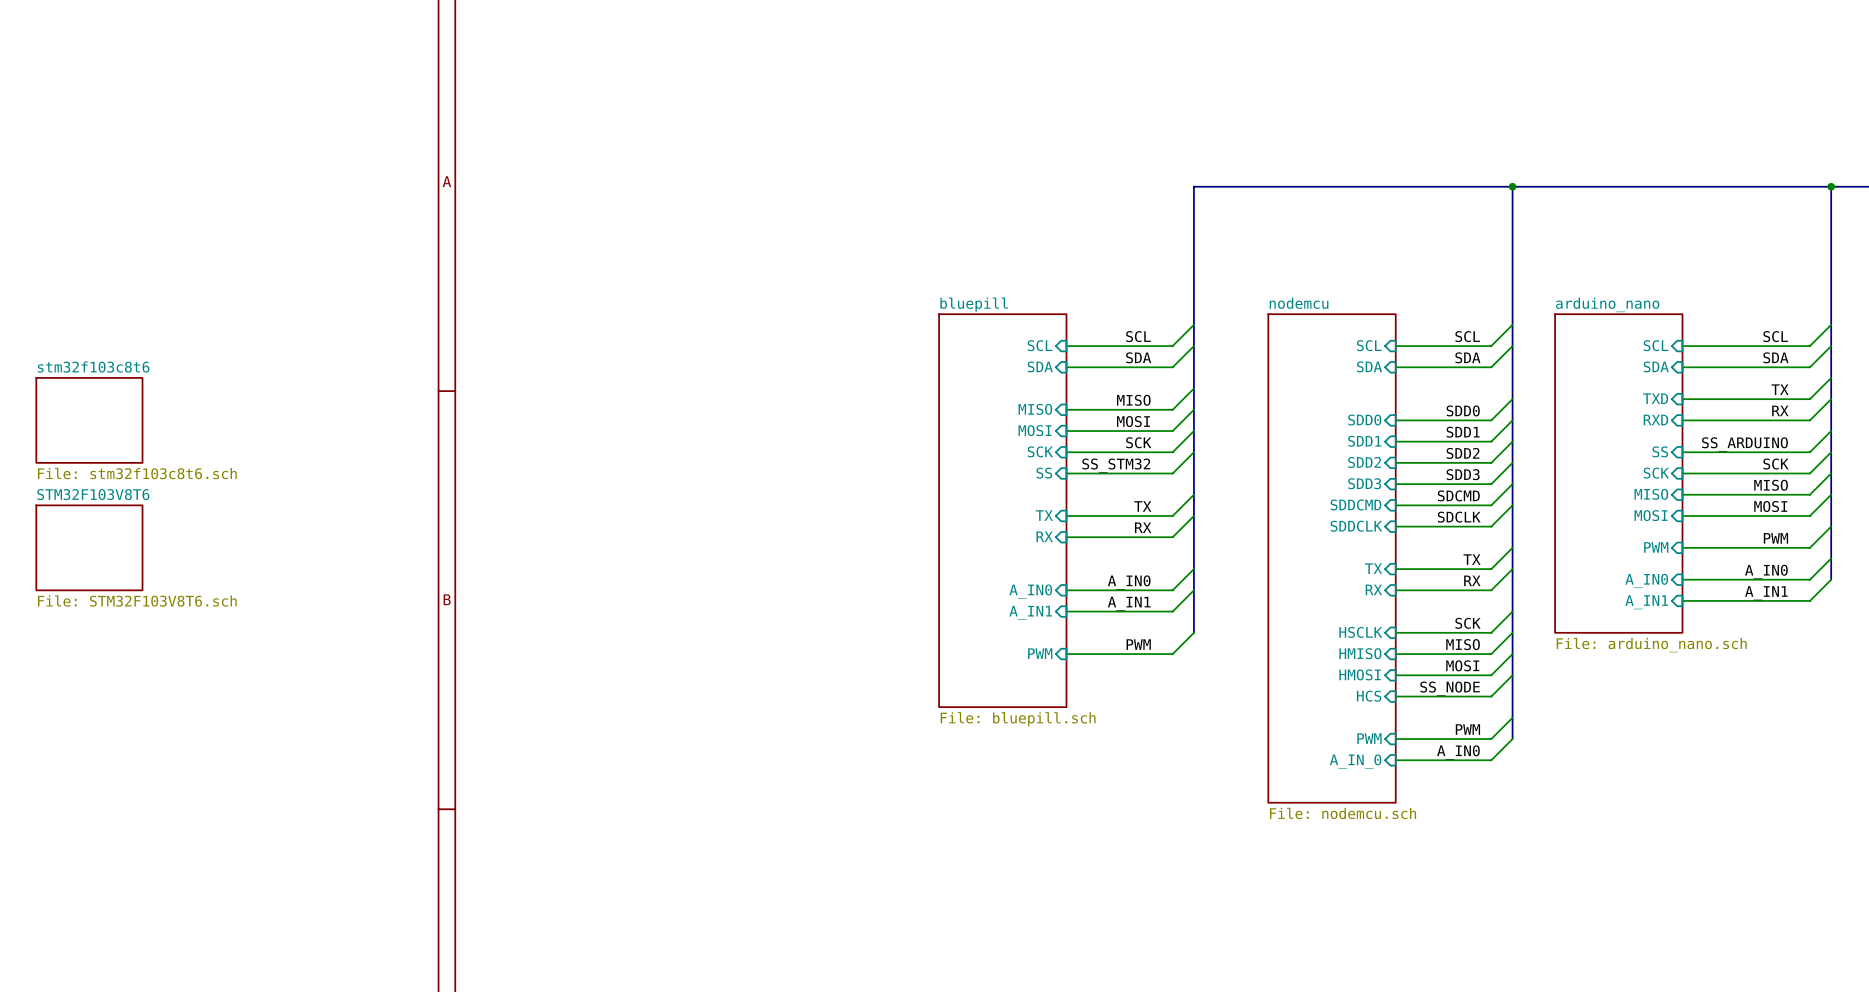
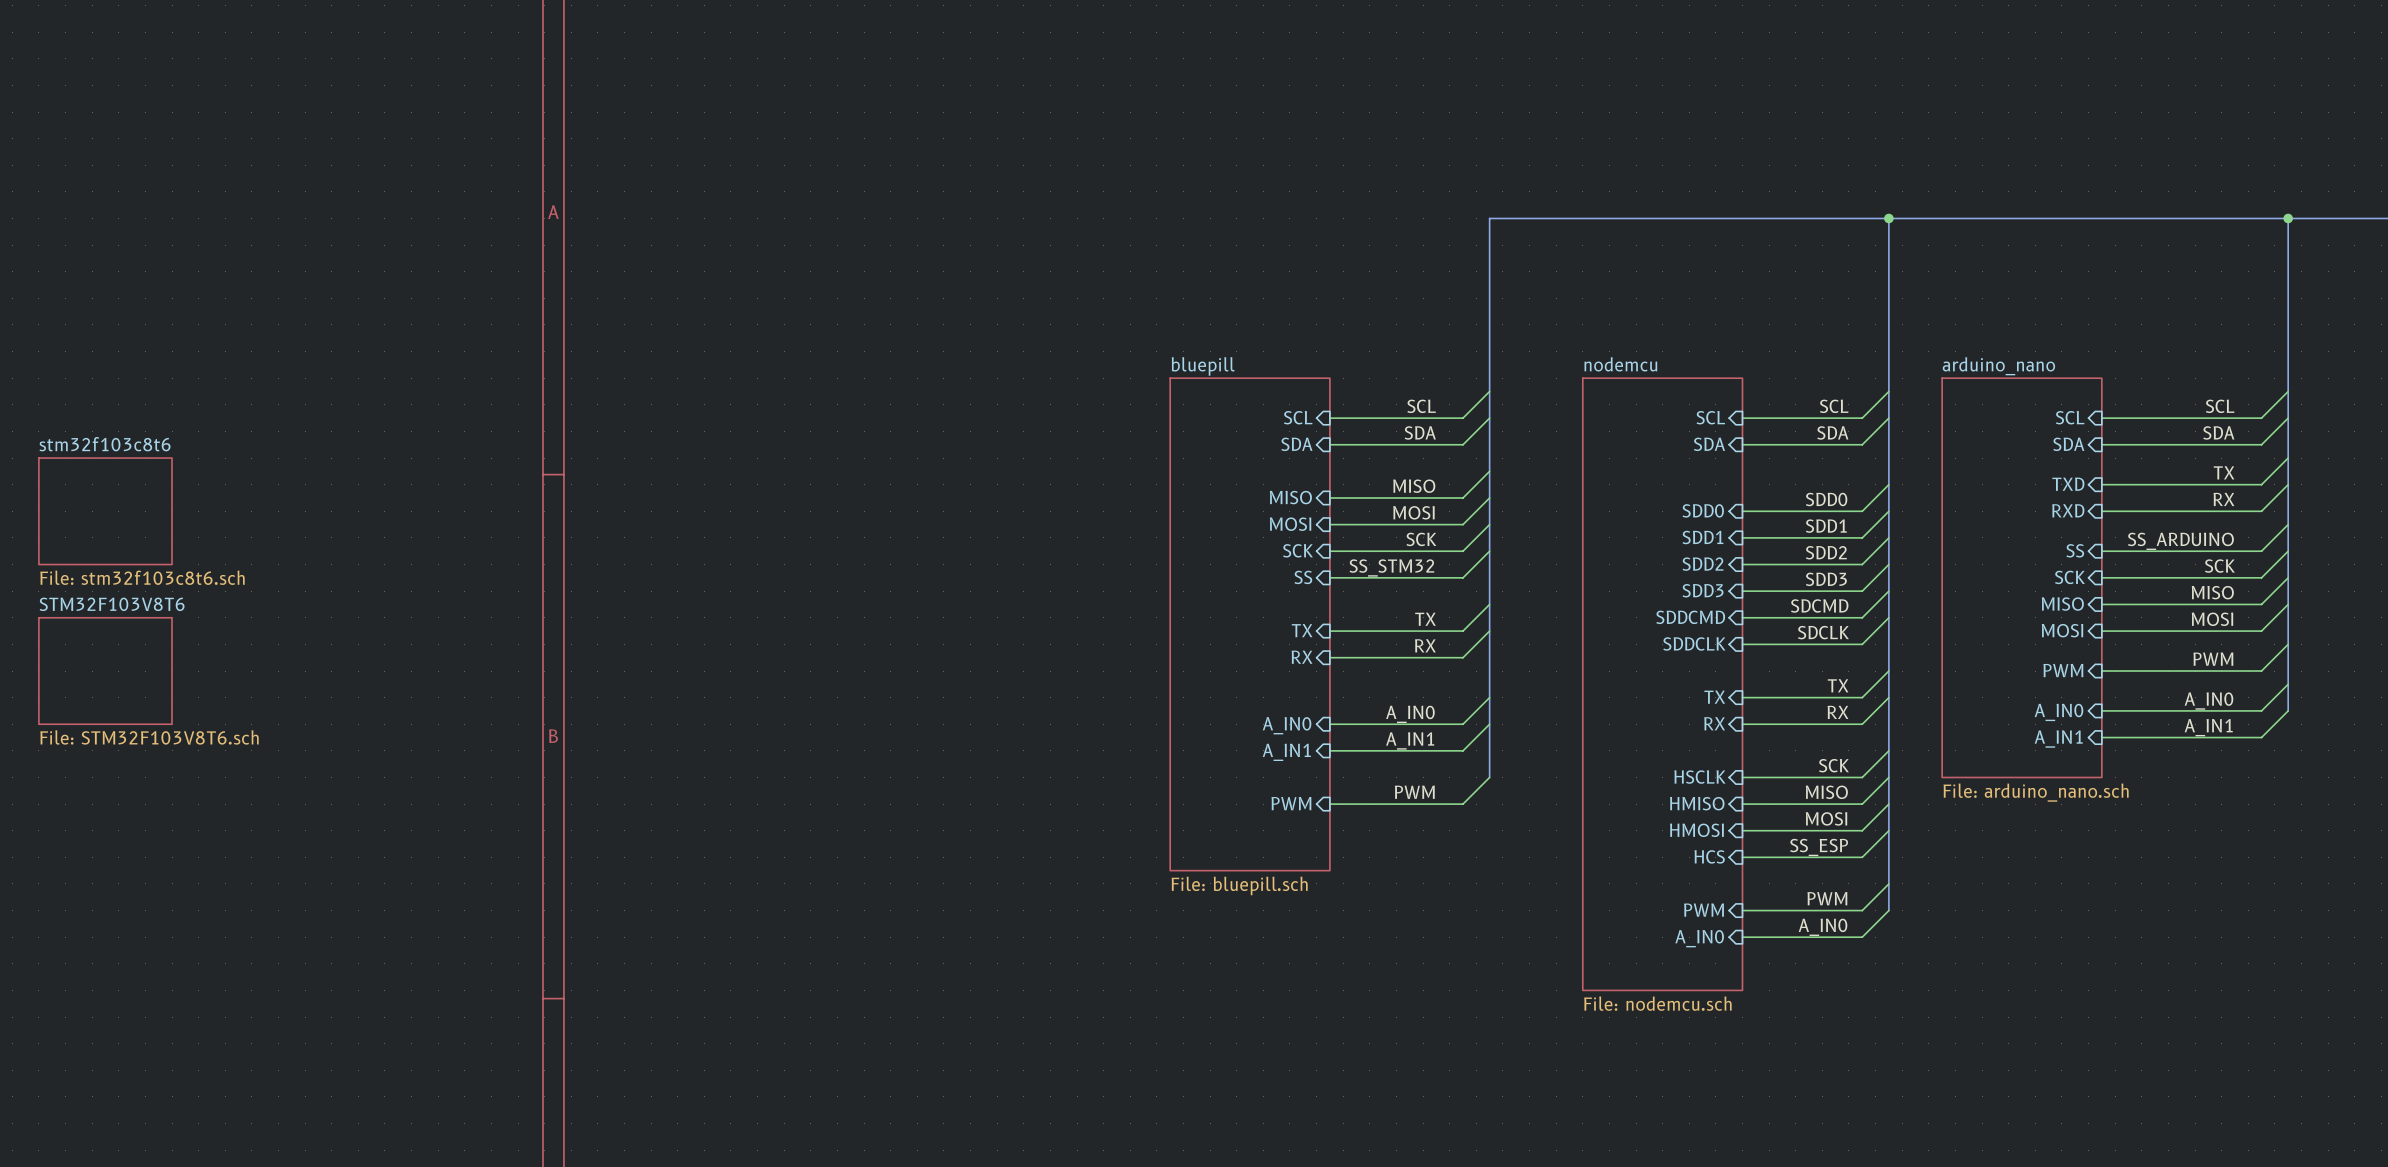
label: SS_NODE (1450, 688) -> SS_ESP (1819, 847)
sheet pin: A_IN_0 (1355, 761) -> A_IN0 (1699, 938)

